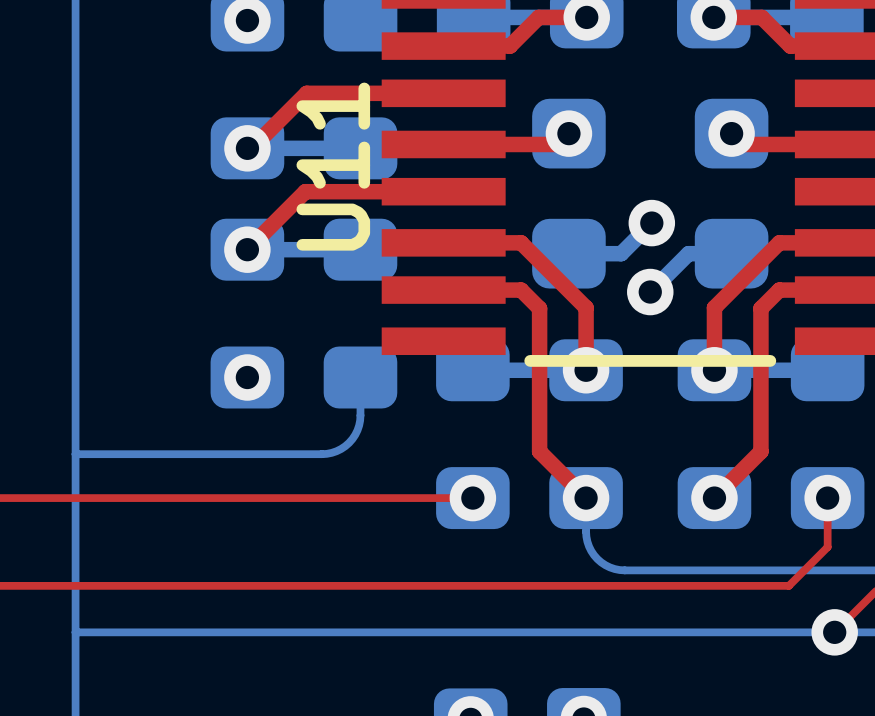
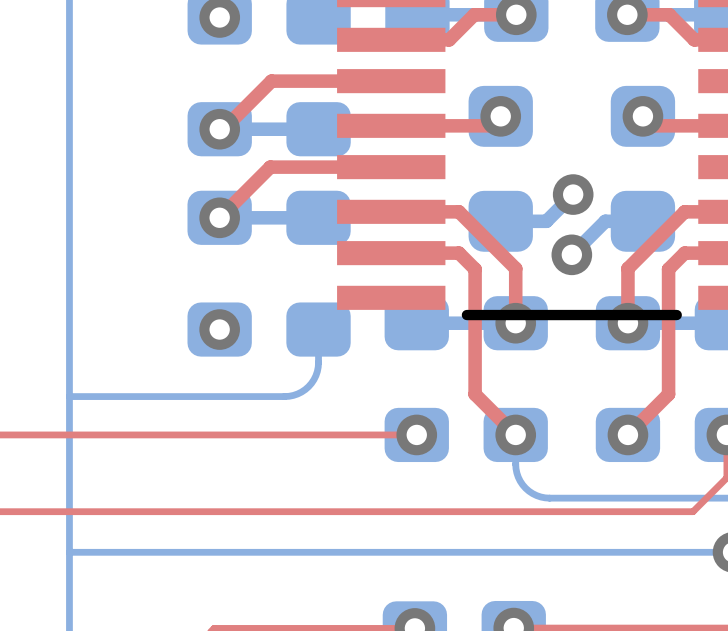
U11 name: U11 (333, 166) -> none

